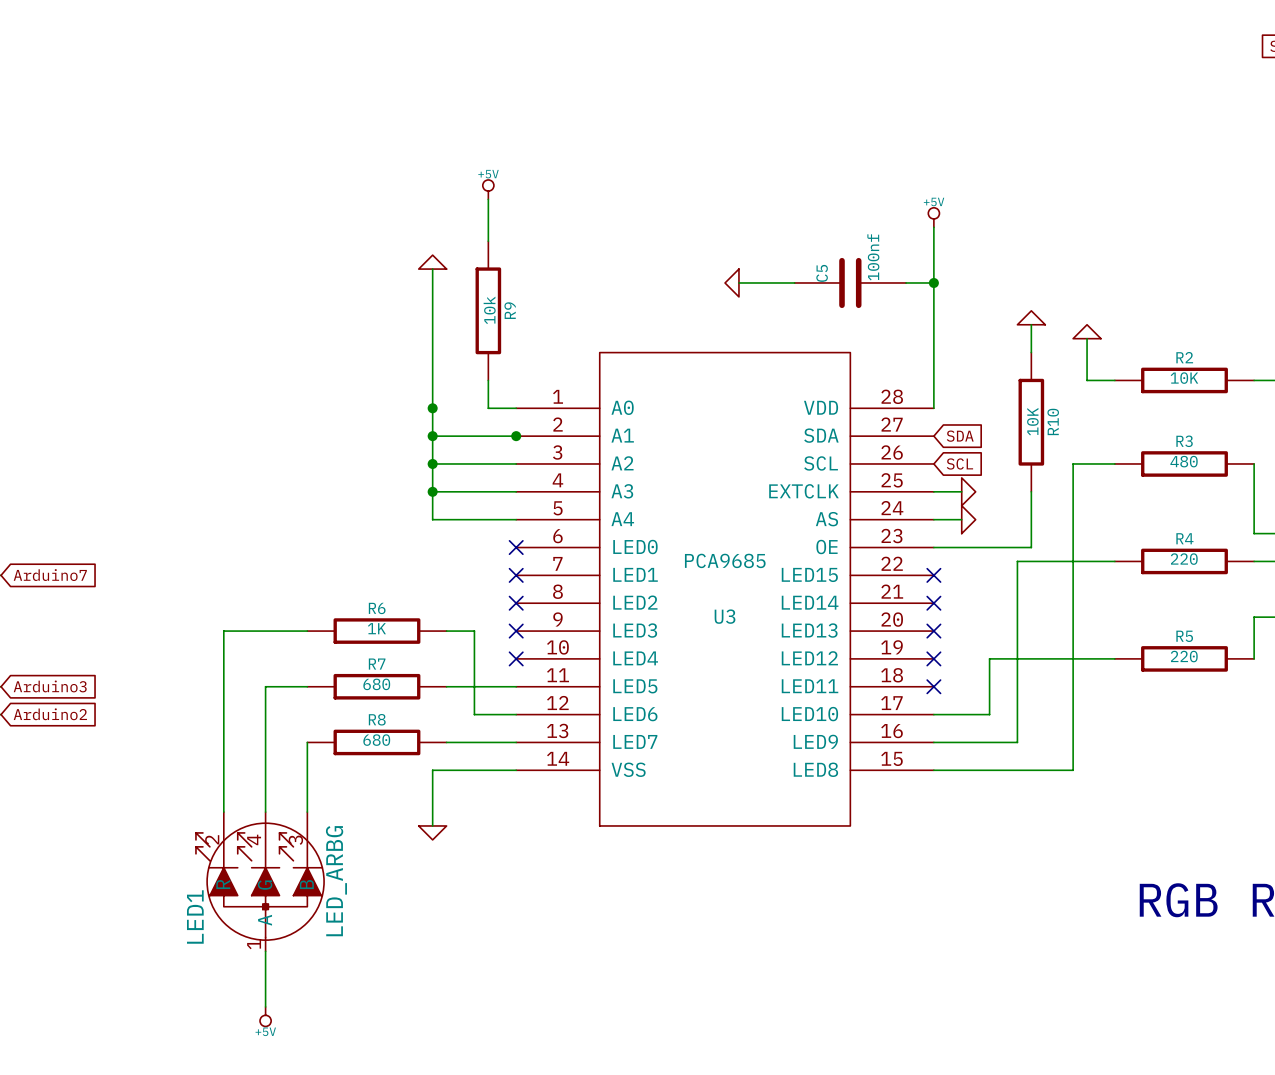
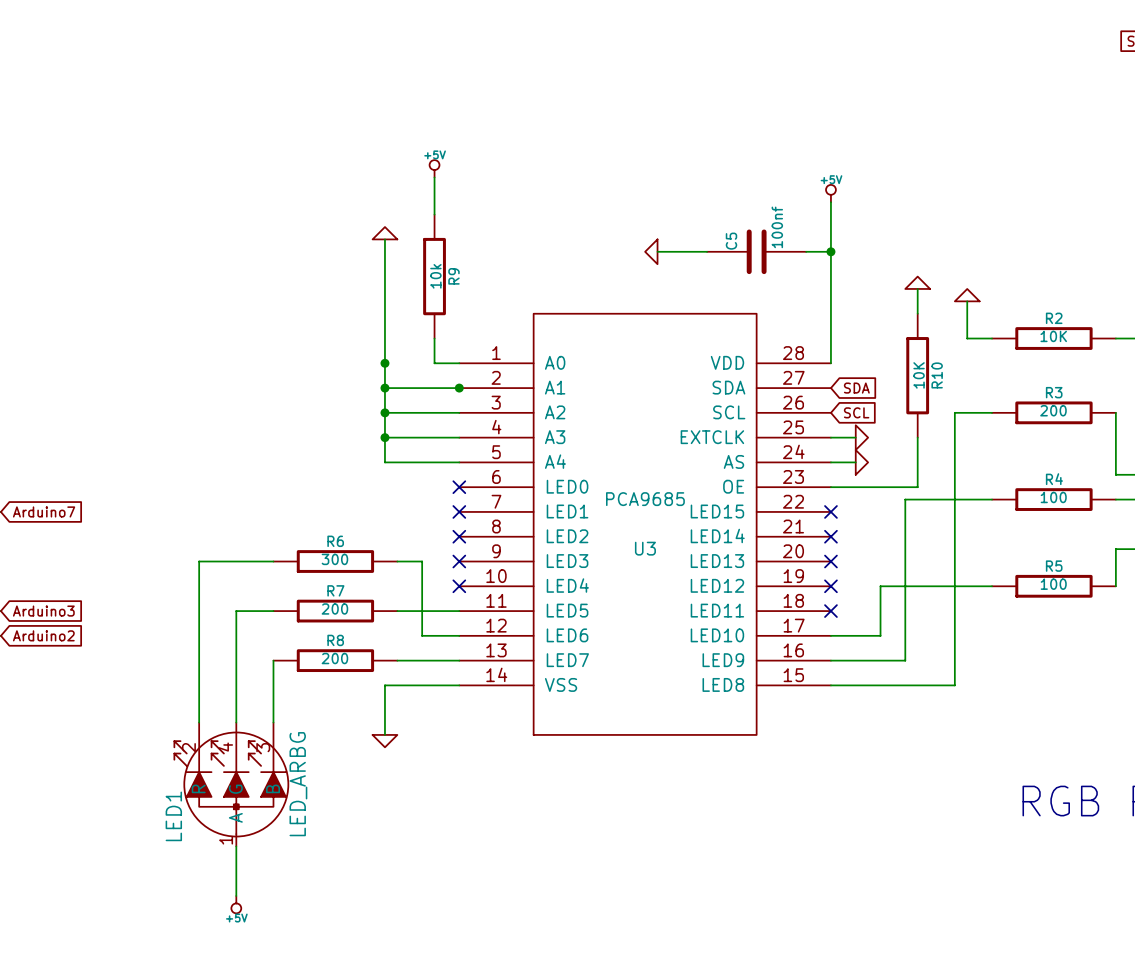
R3 value: 480 (1184, 461) -> 200 (1053, 410)
R4 value: 220 (1184, 559) -> 100 (1053, 497)
R6 value: 1K (376, 628) -> 300 (334, 559)
R5 value: 220 (1184, 656) -> 100 (1053, 584)
R7 value: 680 (376, 684) -> 200 (334, 608)
R8 value: 680 (376, 740) -> 200 (334, 658)

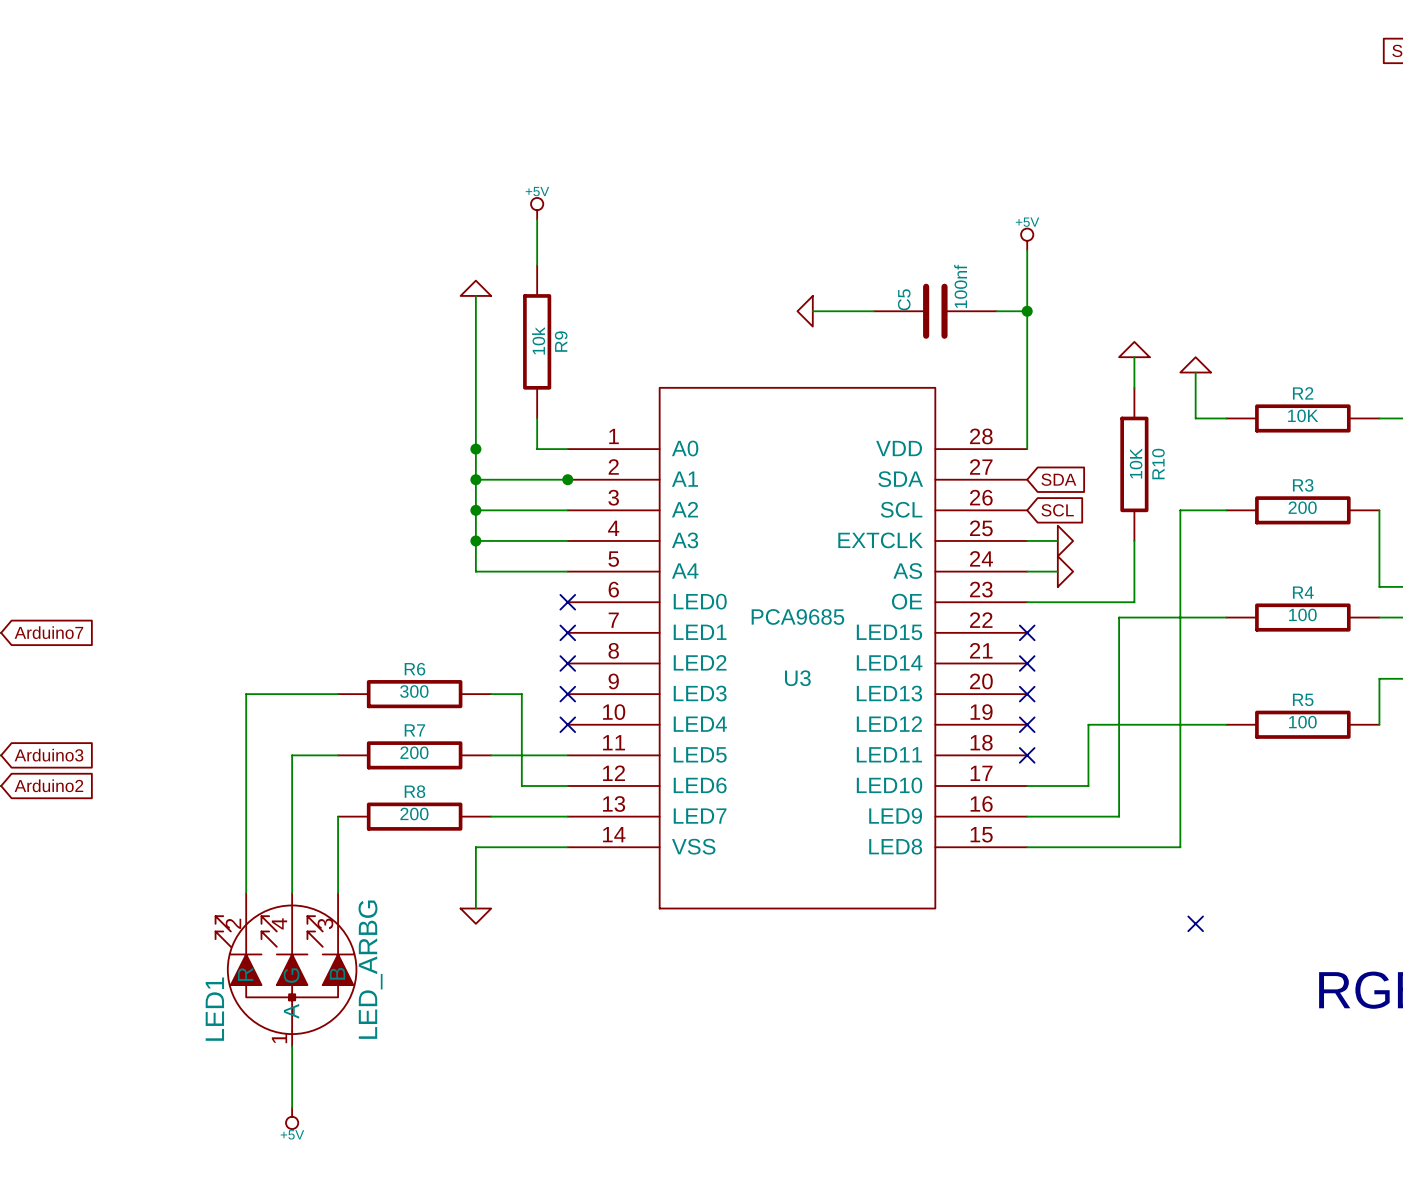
no-connect mark: none -> (1195, 923)

